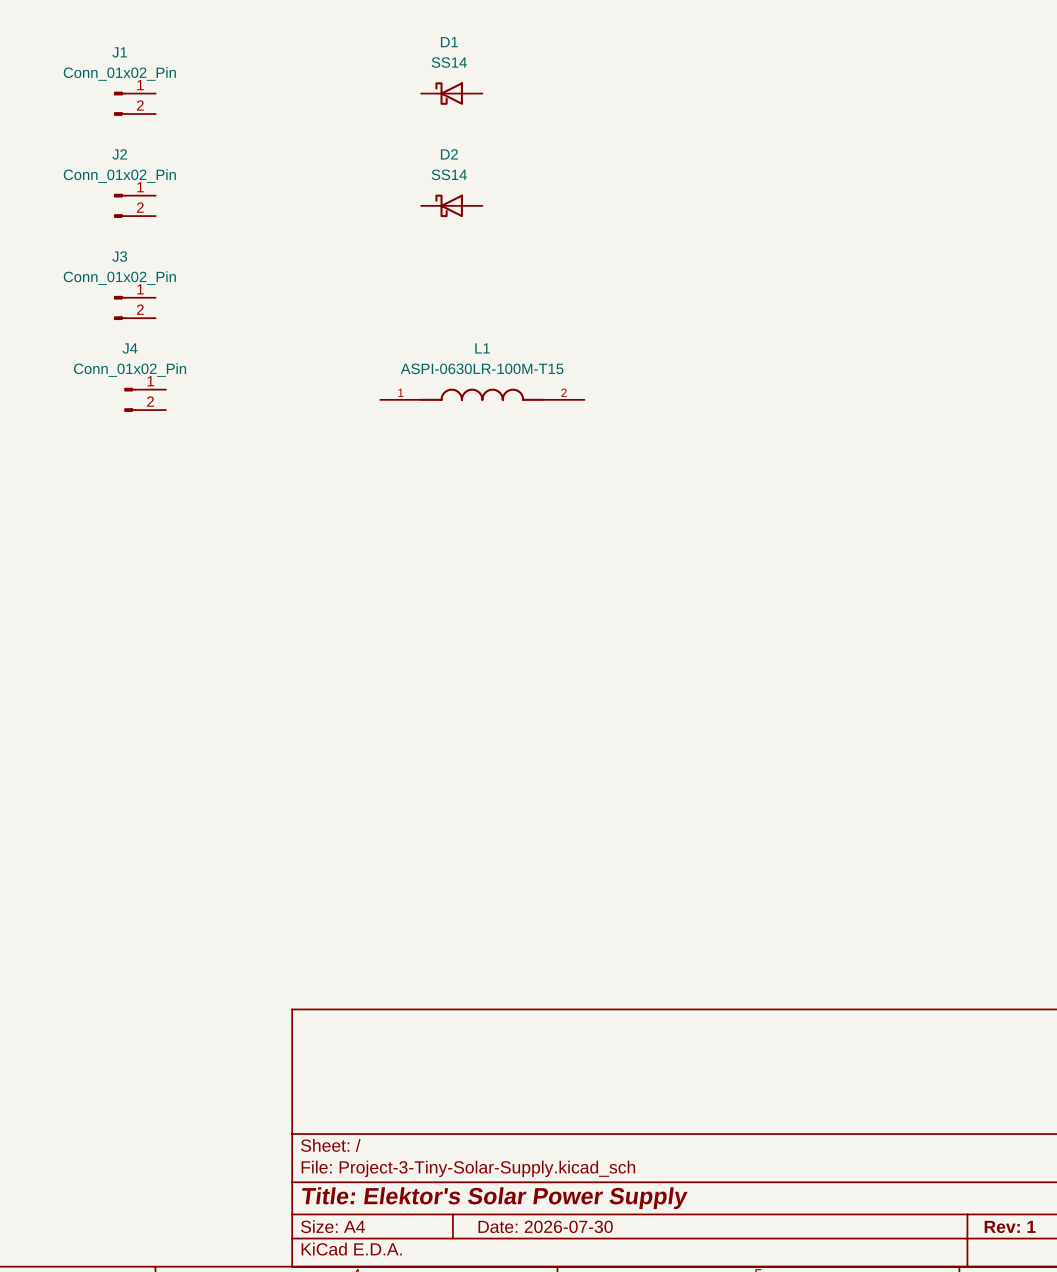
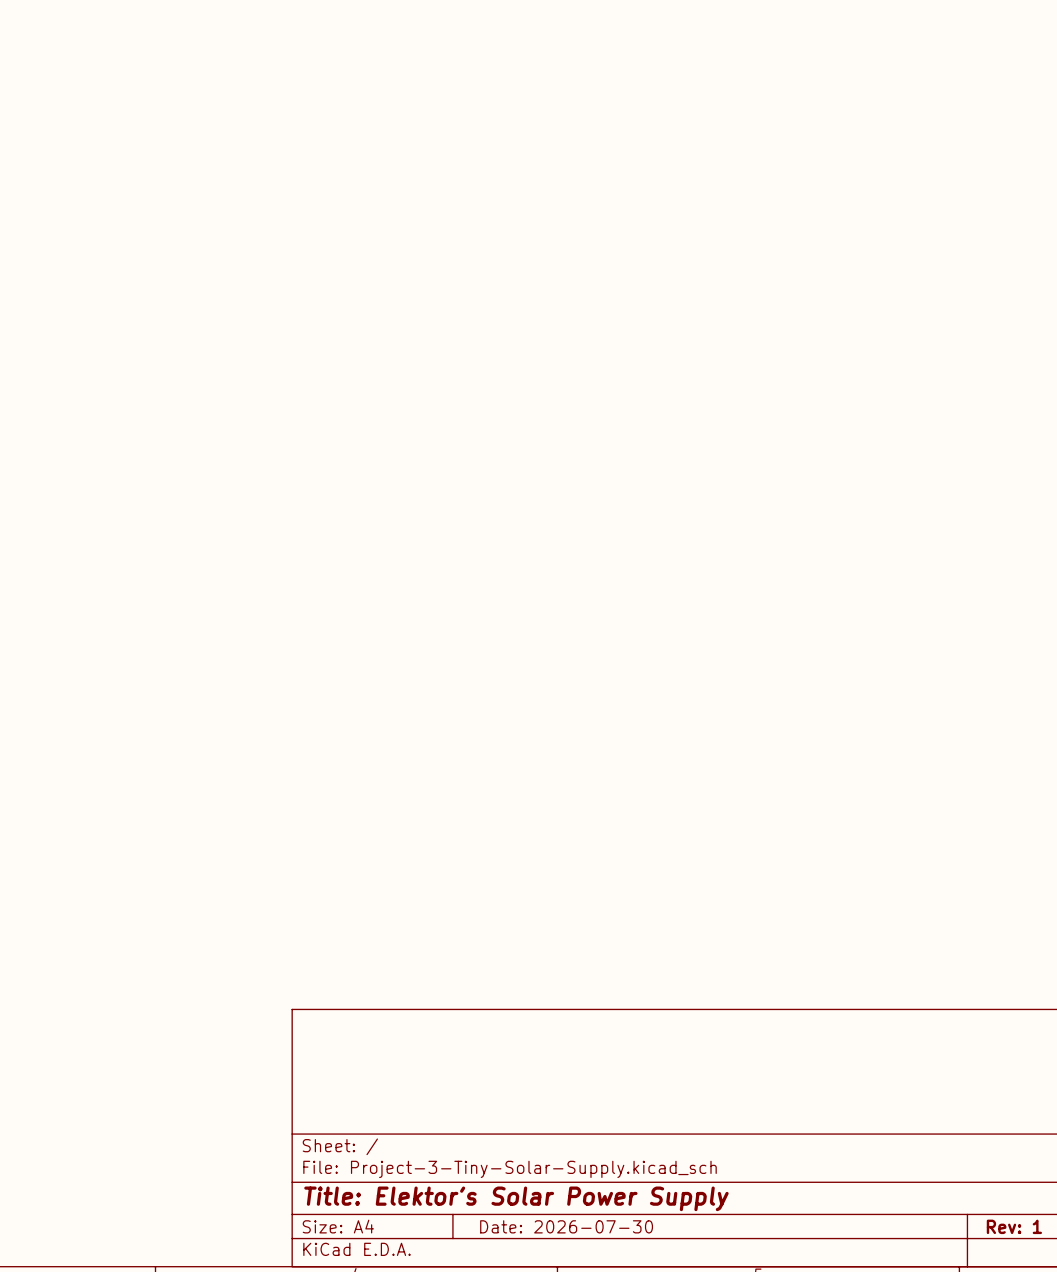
D1: SS14 (451, 93) -> none
J1: Conn_01x02_Pin (134, 103) -> none
J2: Conn_01x02_Pin (134, 205) -> none
D2: SS14 (451, 205) -> none
J3: Conn_01x02_Pin (134, 307) -> none
L1: ASPI-0630LR-100M-T15 (482, 394) -> none
J4: Conn_01x02_Pin (145, 399) -> none

